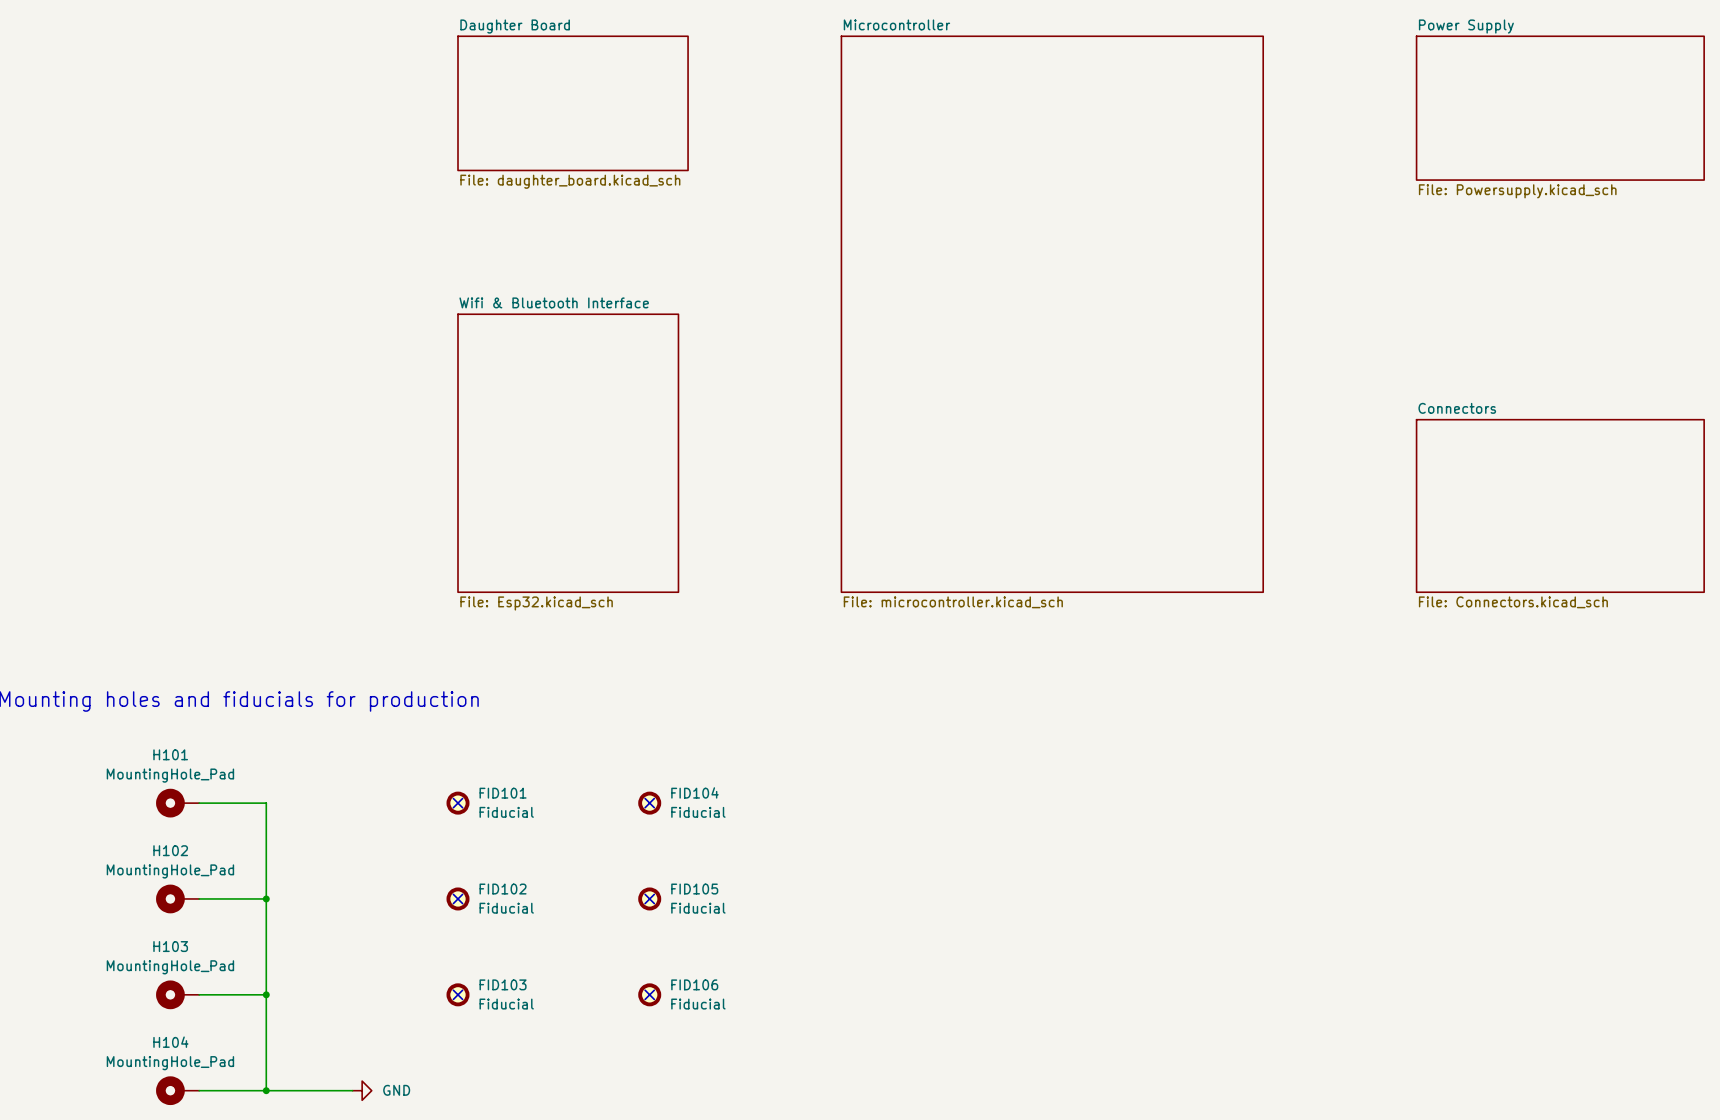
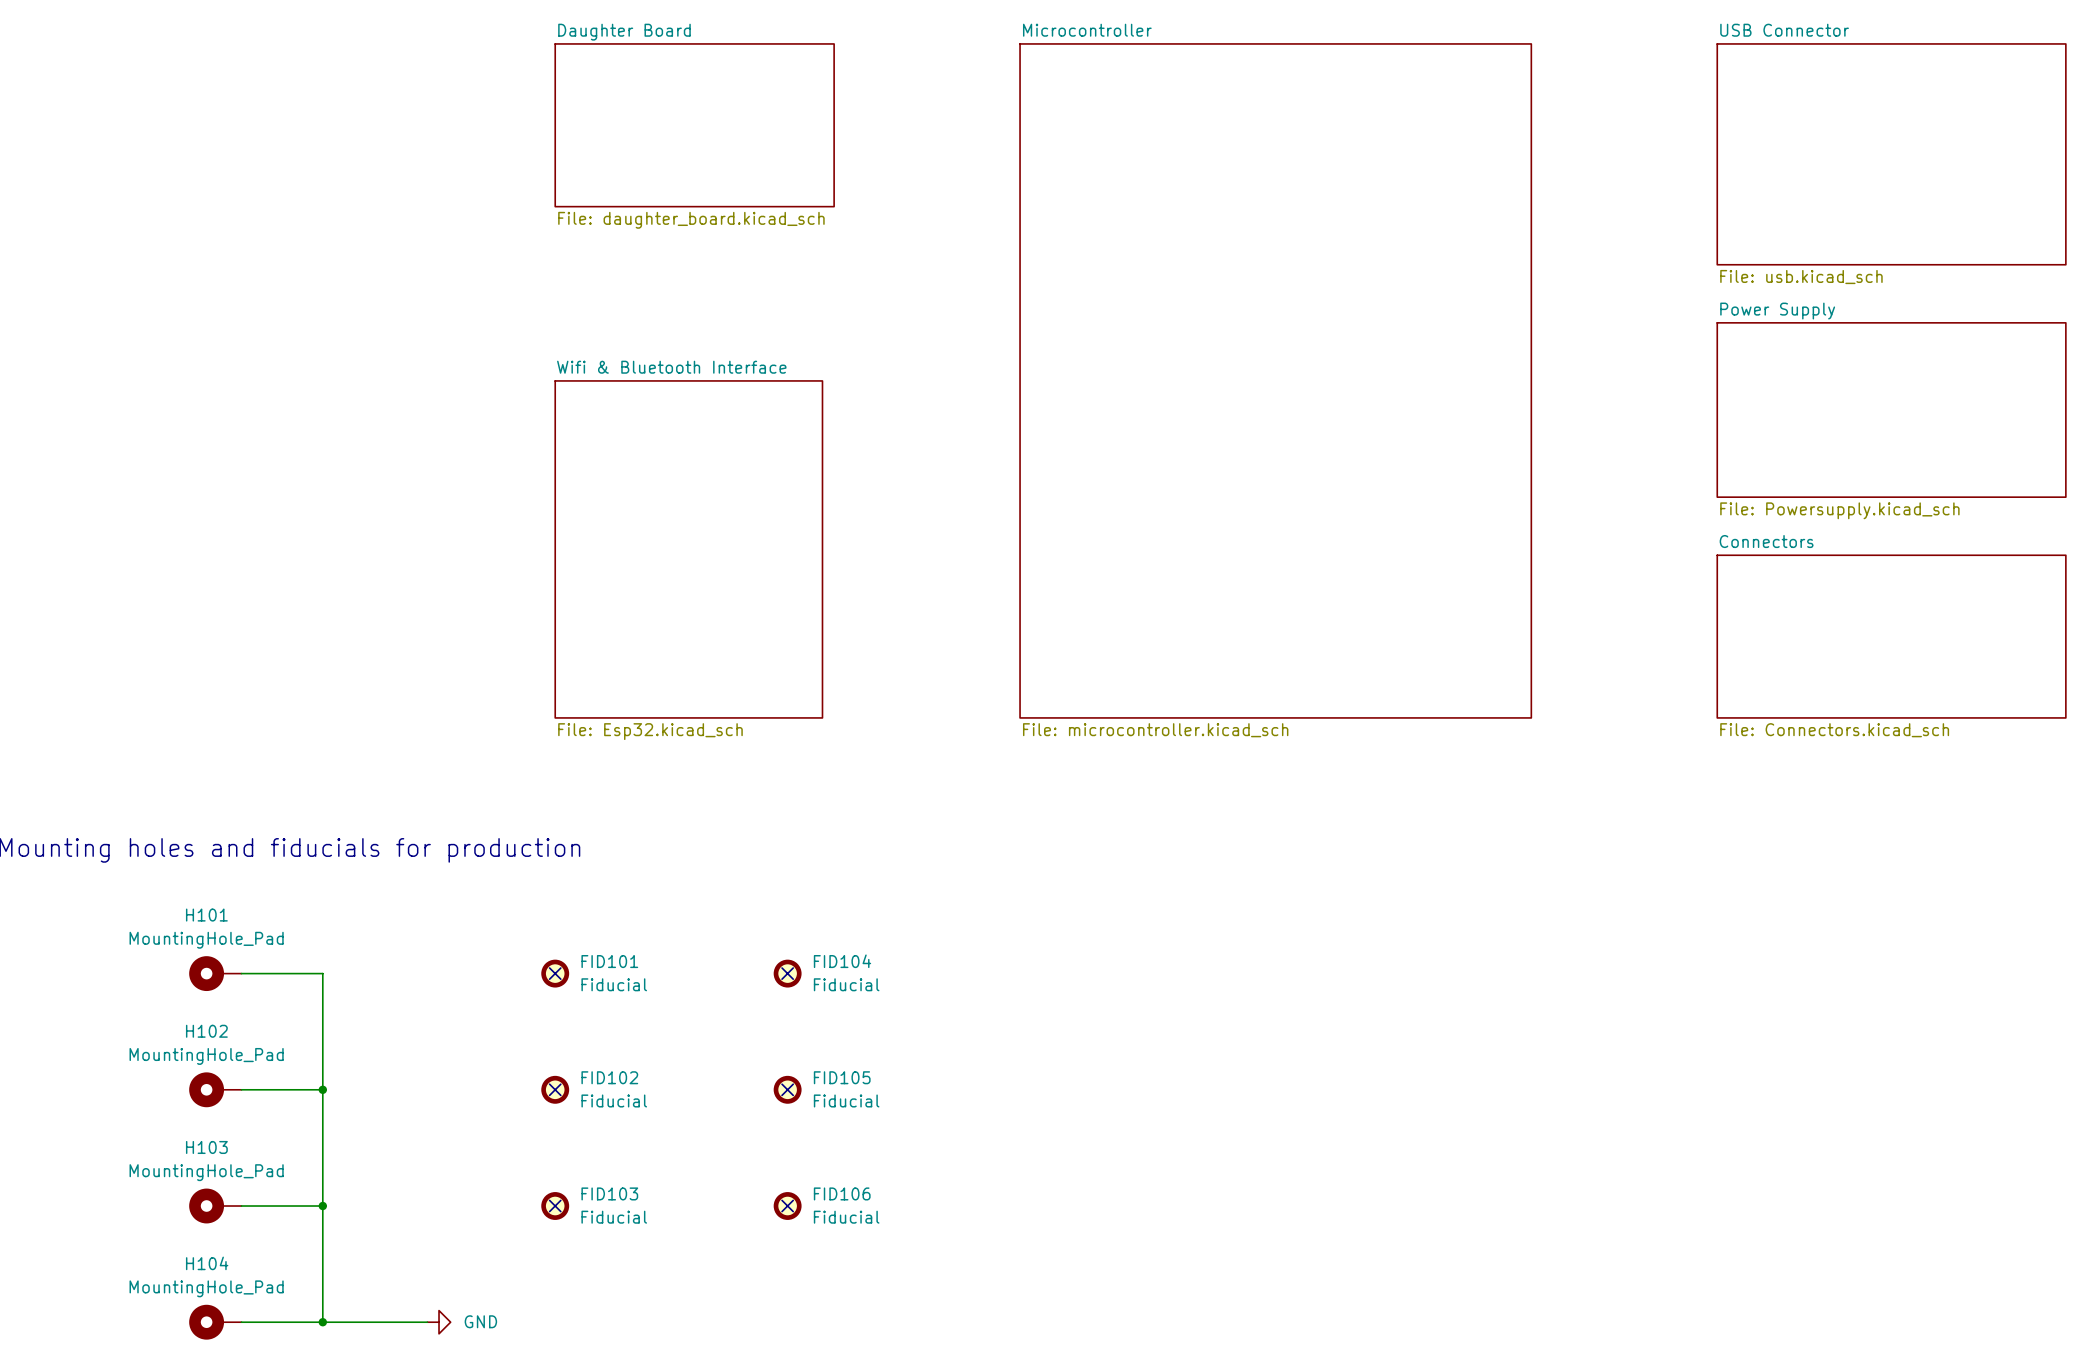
sheet Power Supply: File: Powersupply.kicad_sch (1560, 108) -> none
sheet USB Connector: none -> File: usb.kicad_sch (1891, 154)
sheet Power Supply: none -> File: Powersupply.kicad_sch (1891, 410)
sheet Connectors: File: Connectors.kicad_sch (1560, 505) -> none
sheet Connectors: none -> File: Connectors.kicad_sch (1891, 636)

